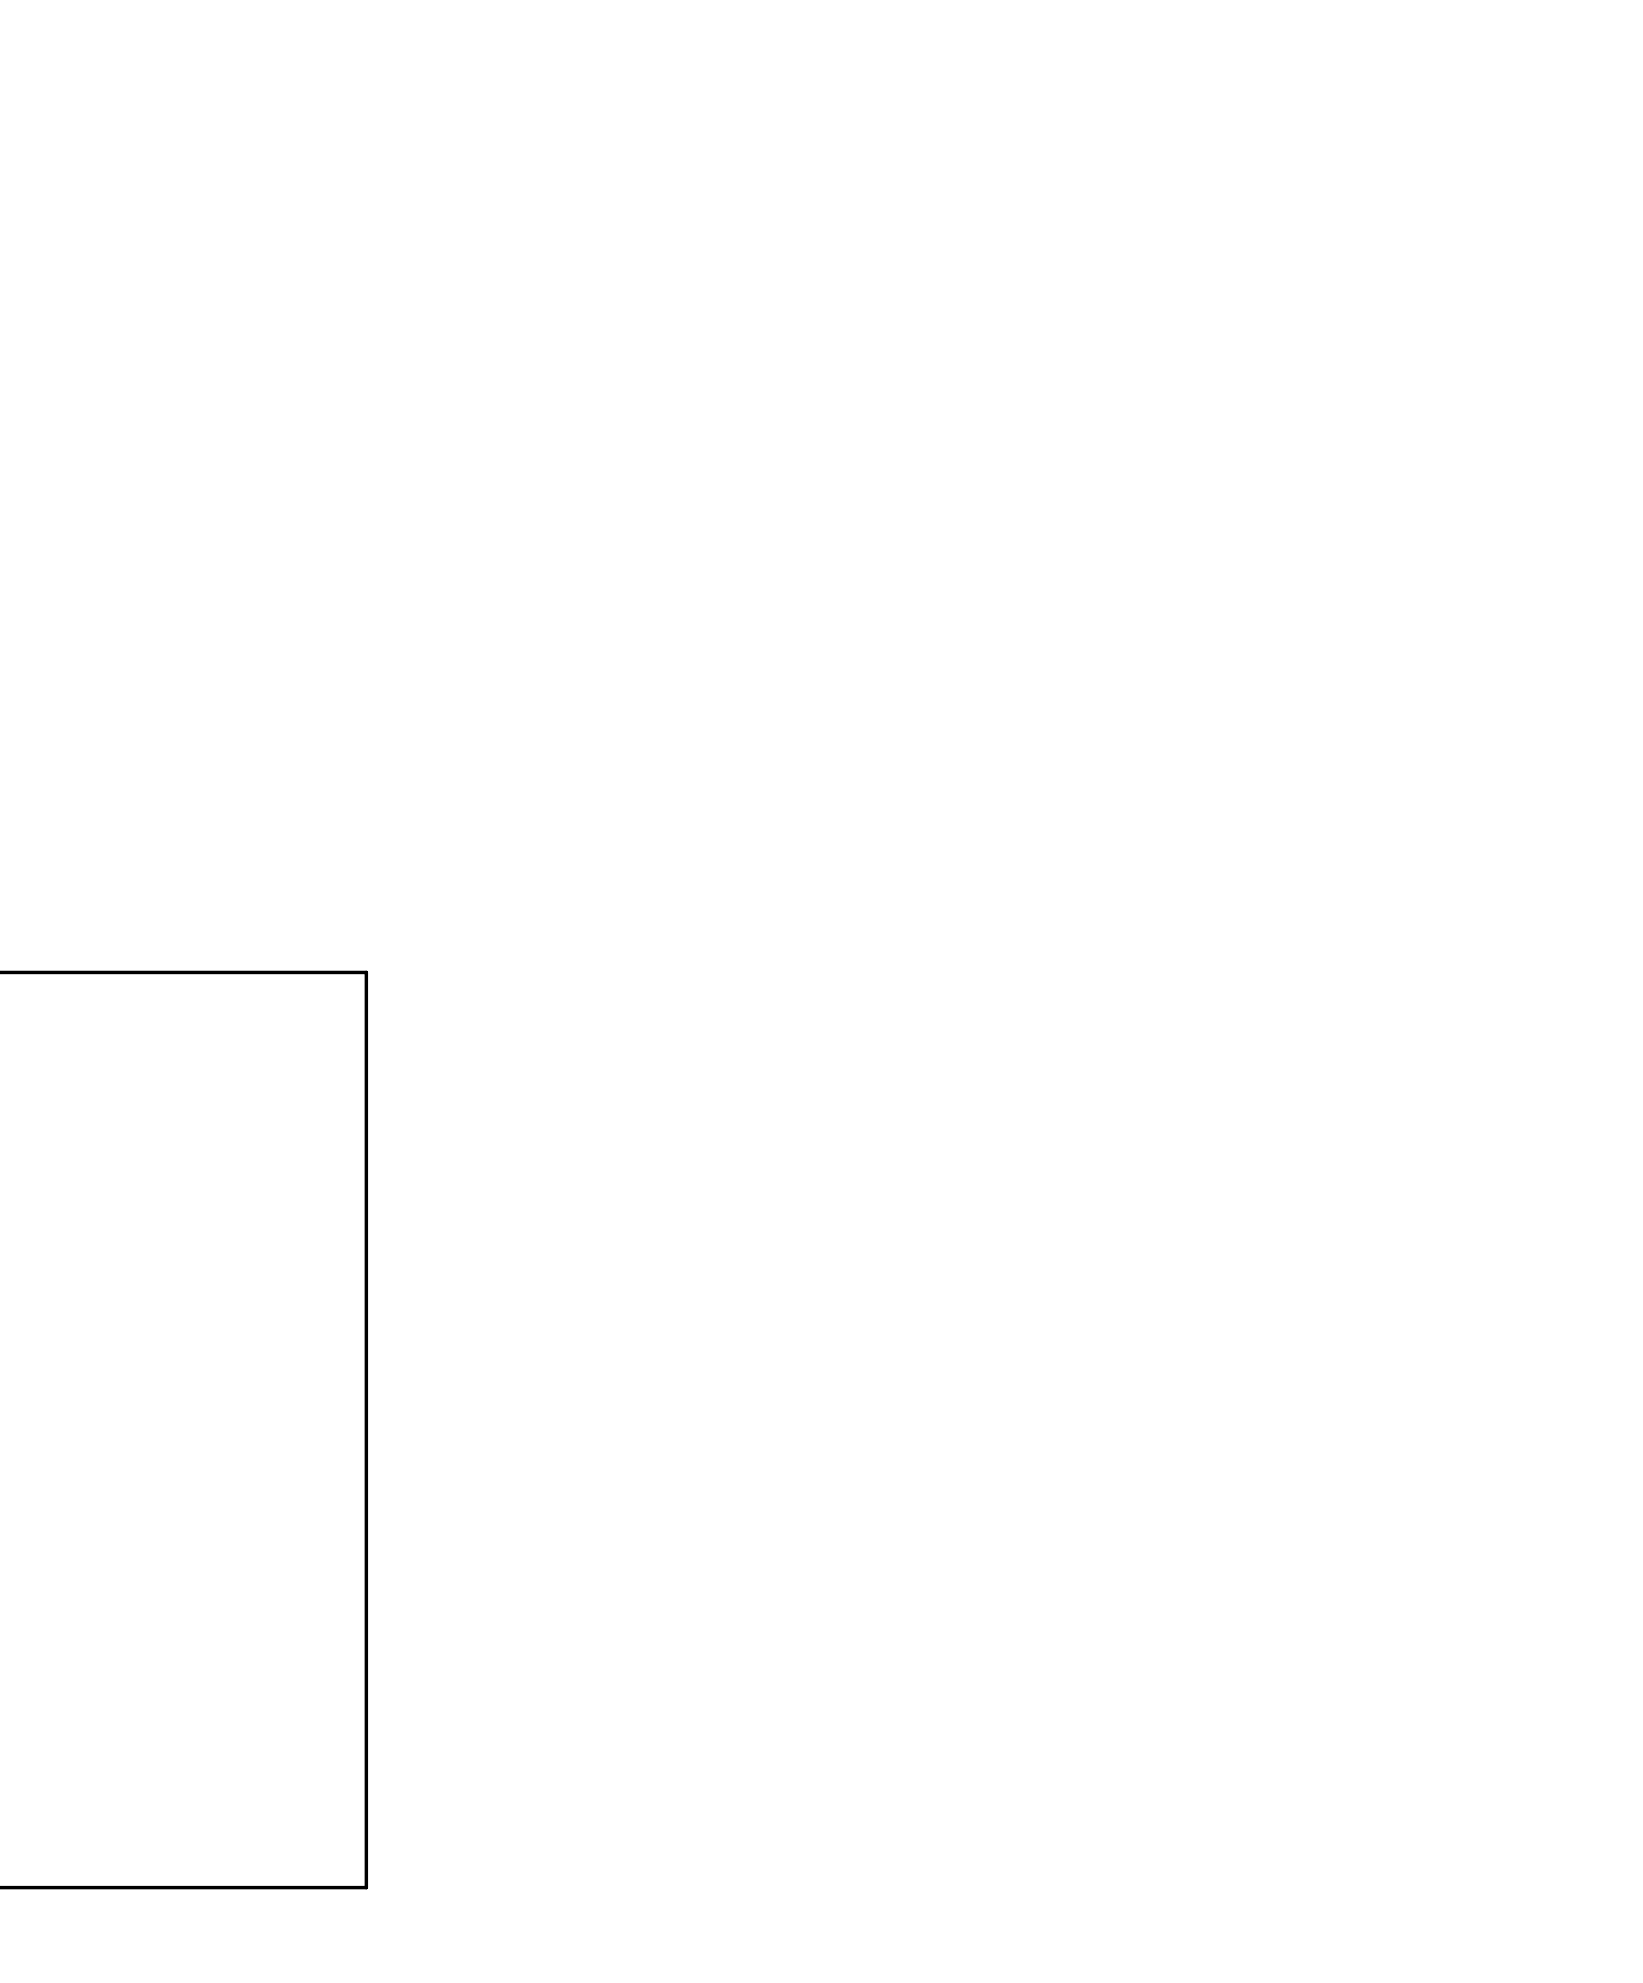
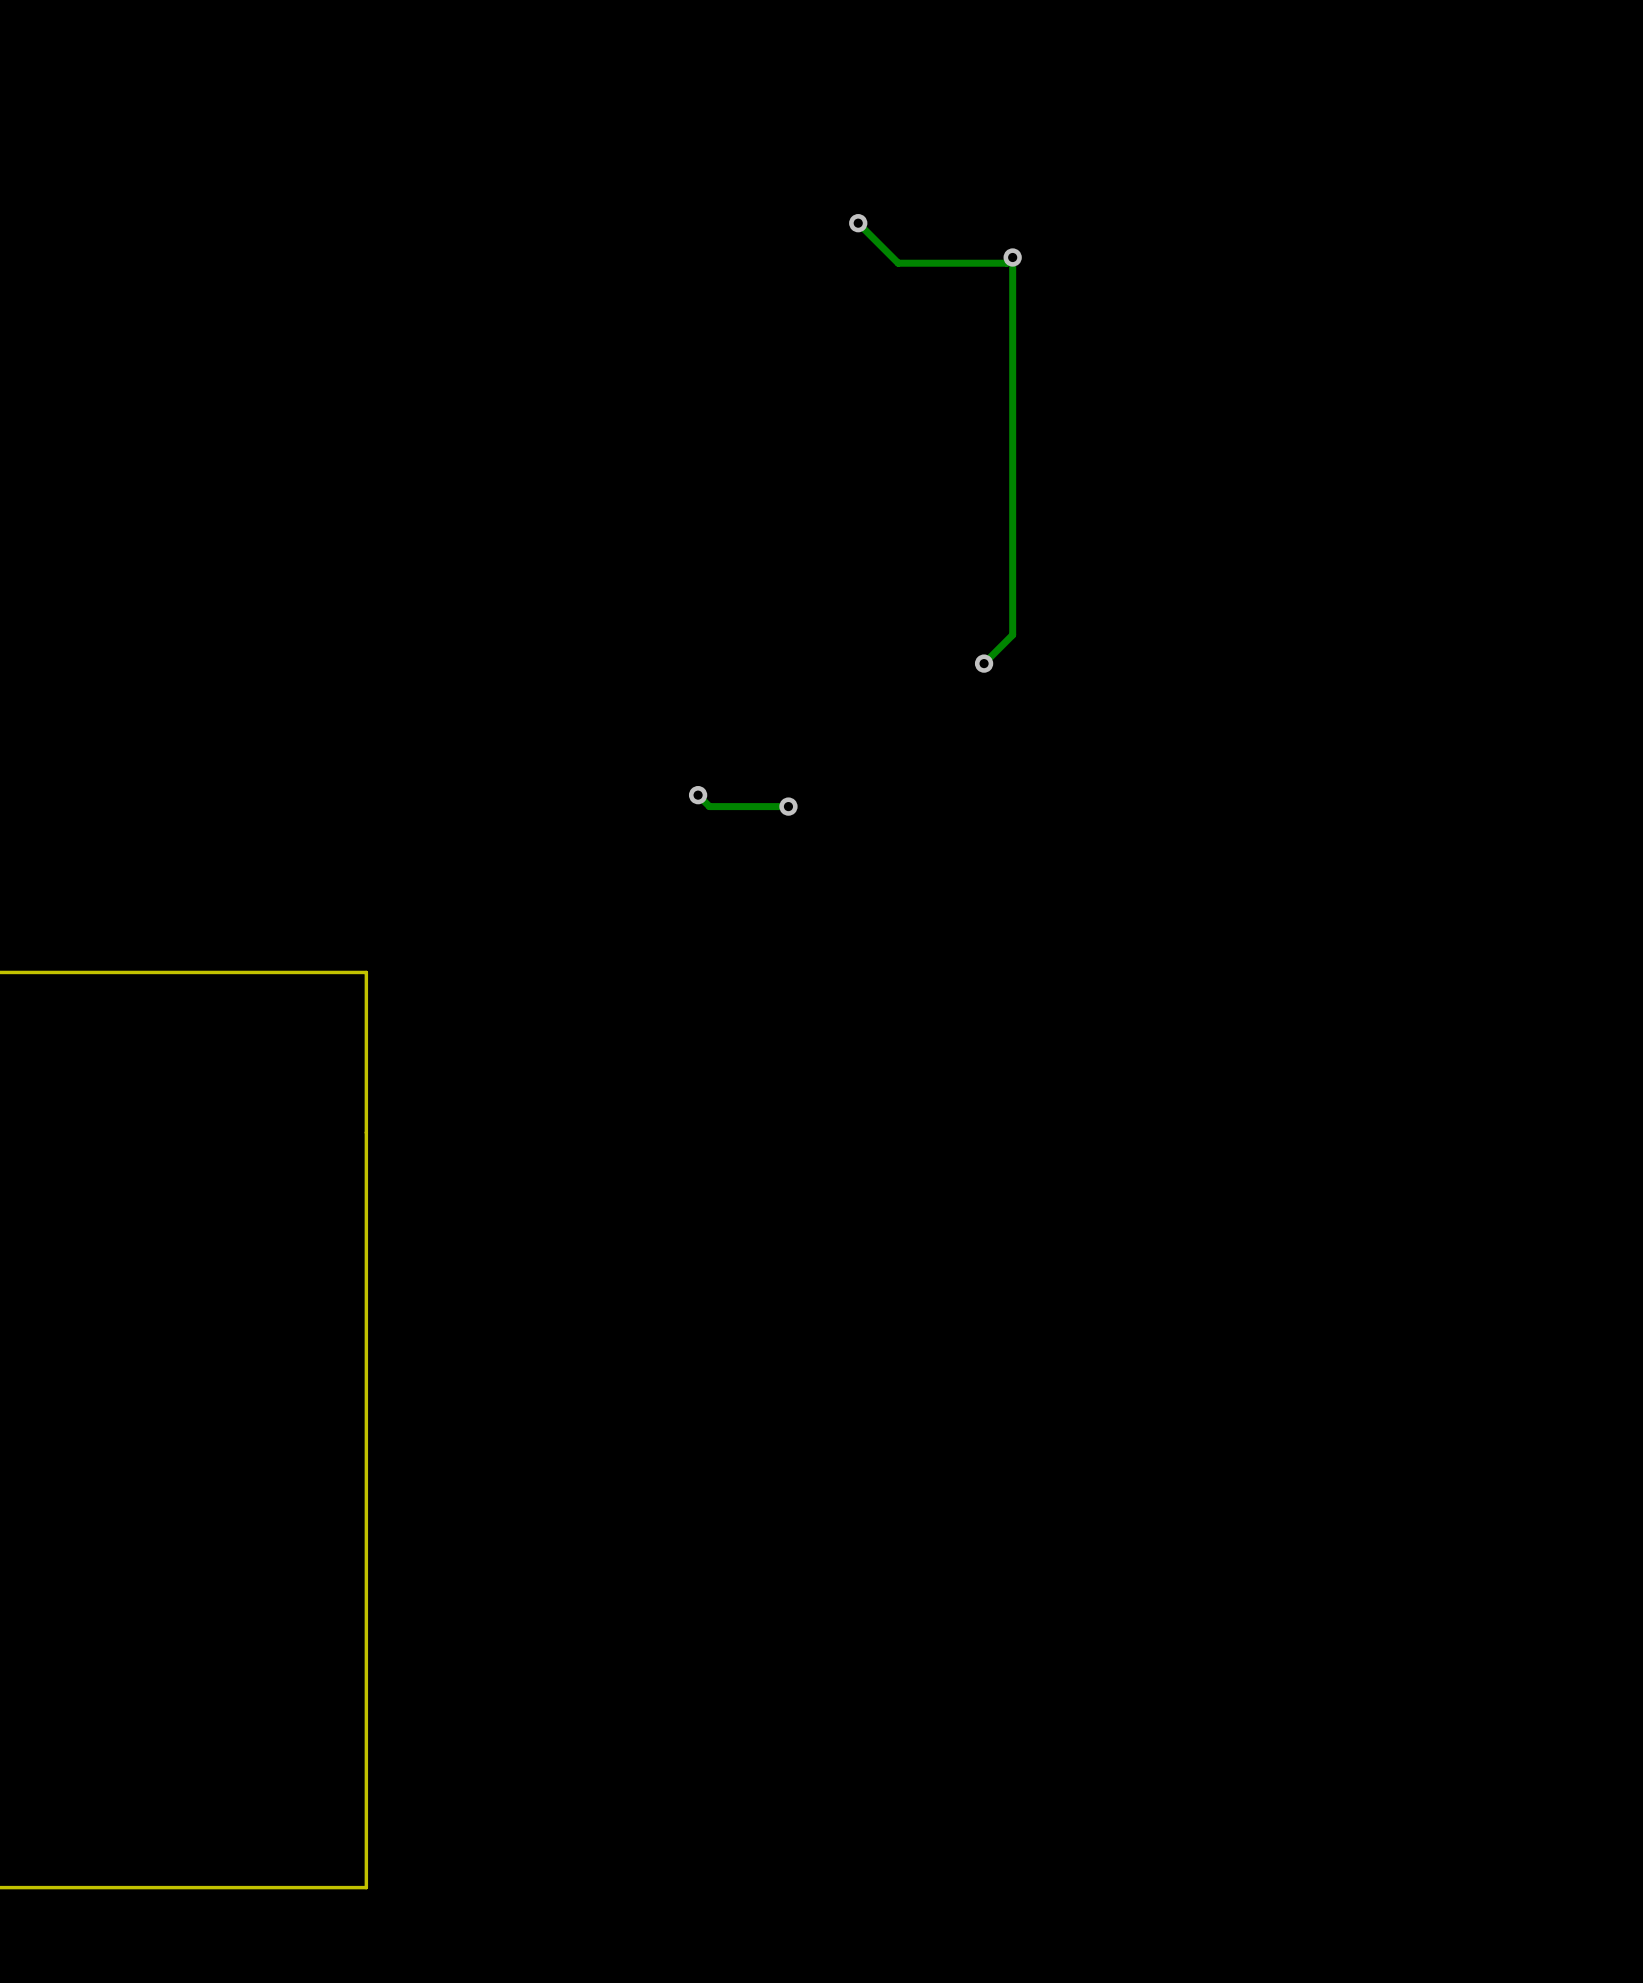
track: none -> (858, 223) (898, 263) (1006, 263) (1012, 257) (1012, 634) (984, 663)
via: none -> (858, 223)
via: none -> (1012, 257)
via: none -> (984, 663)
track: none -> (698, 795) (709, 806) (788, 806)
via: none -> (698, 795)
via: none -> (788, 806)

